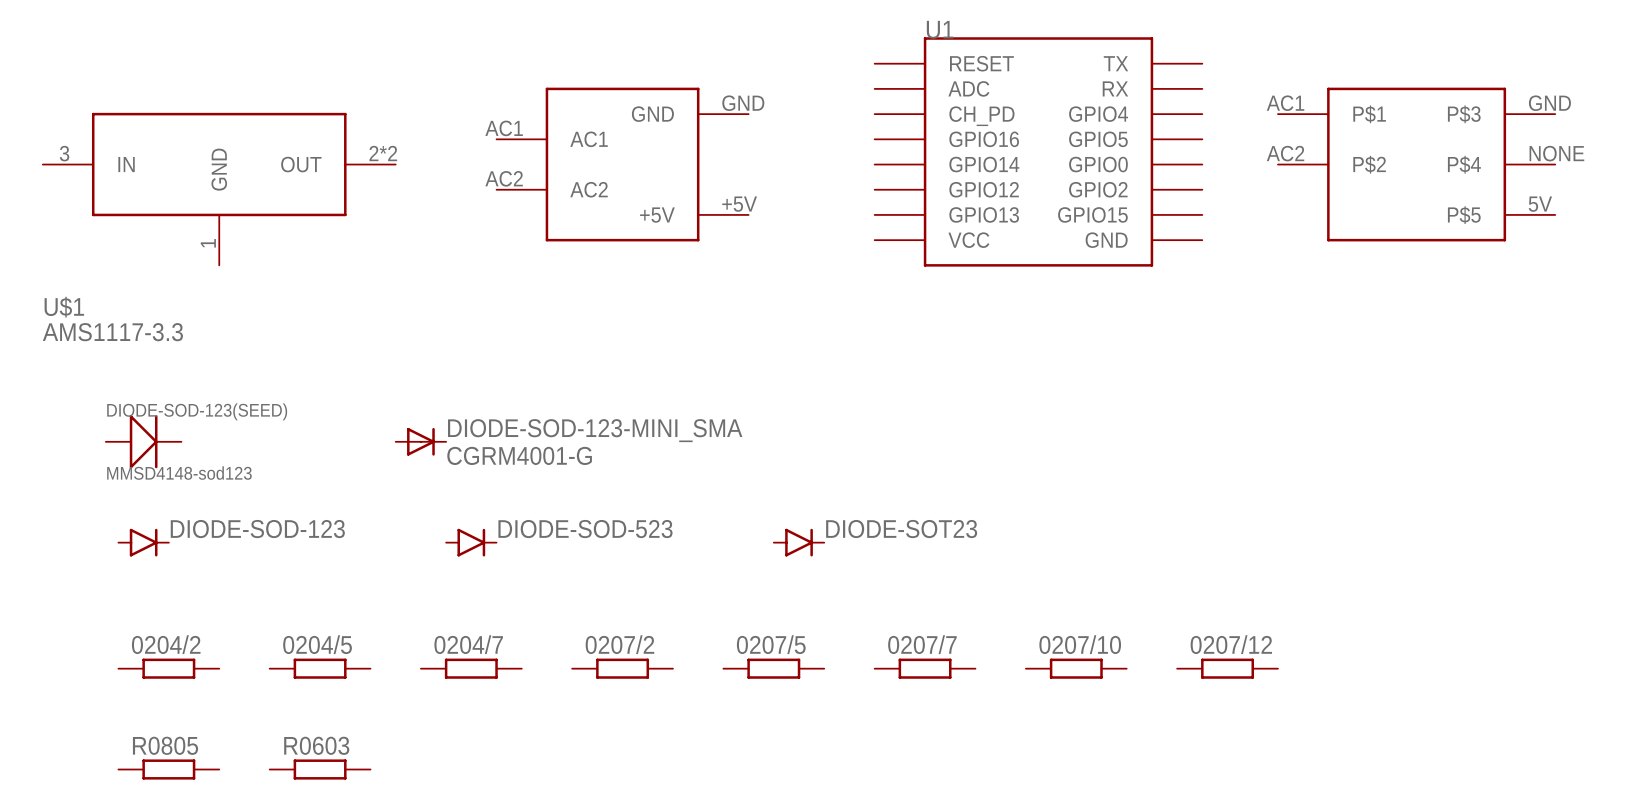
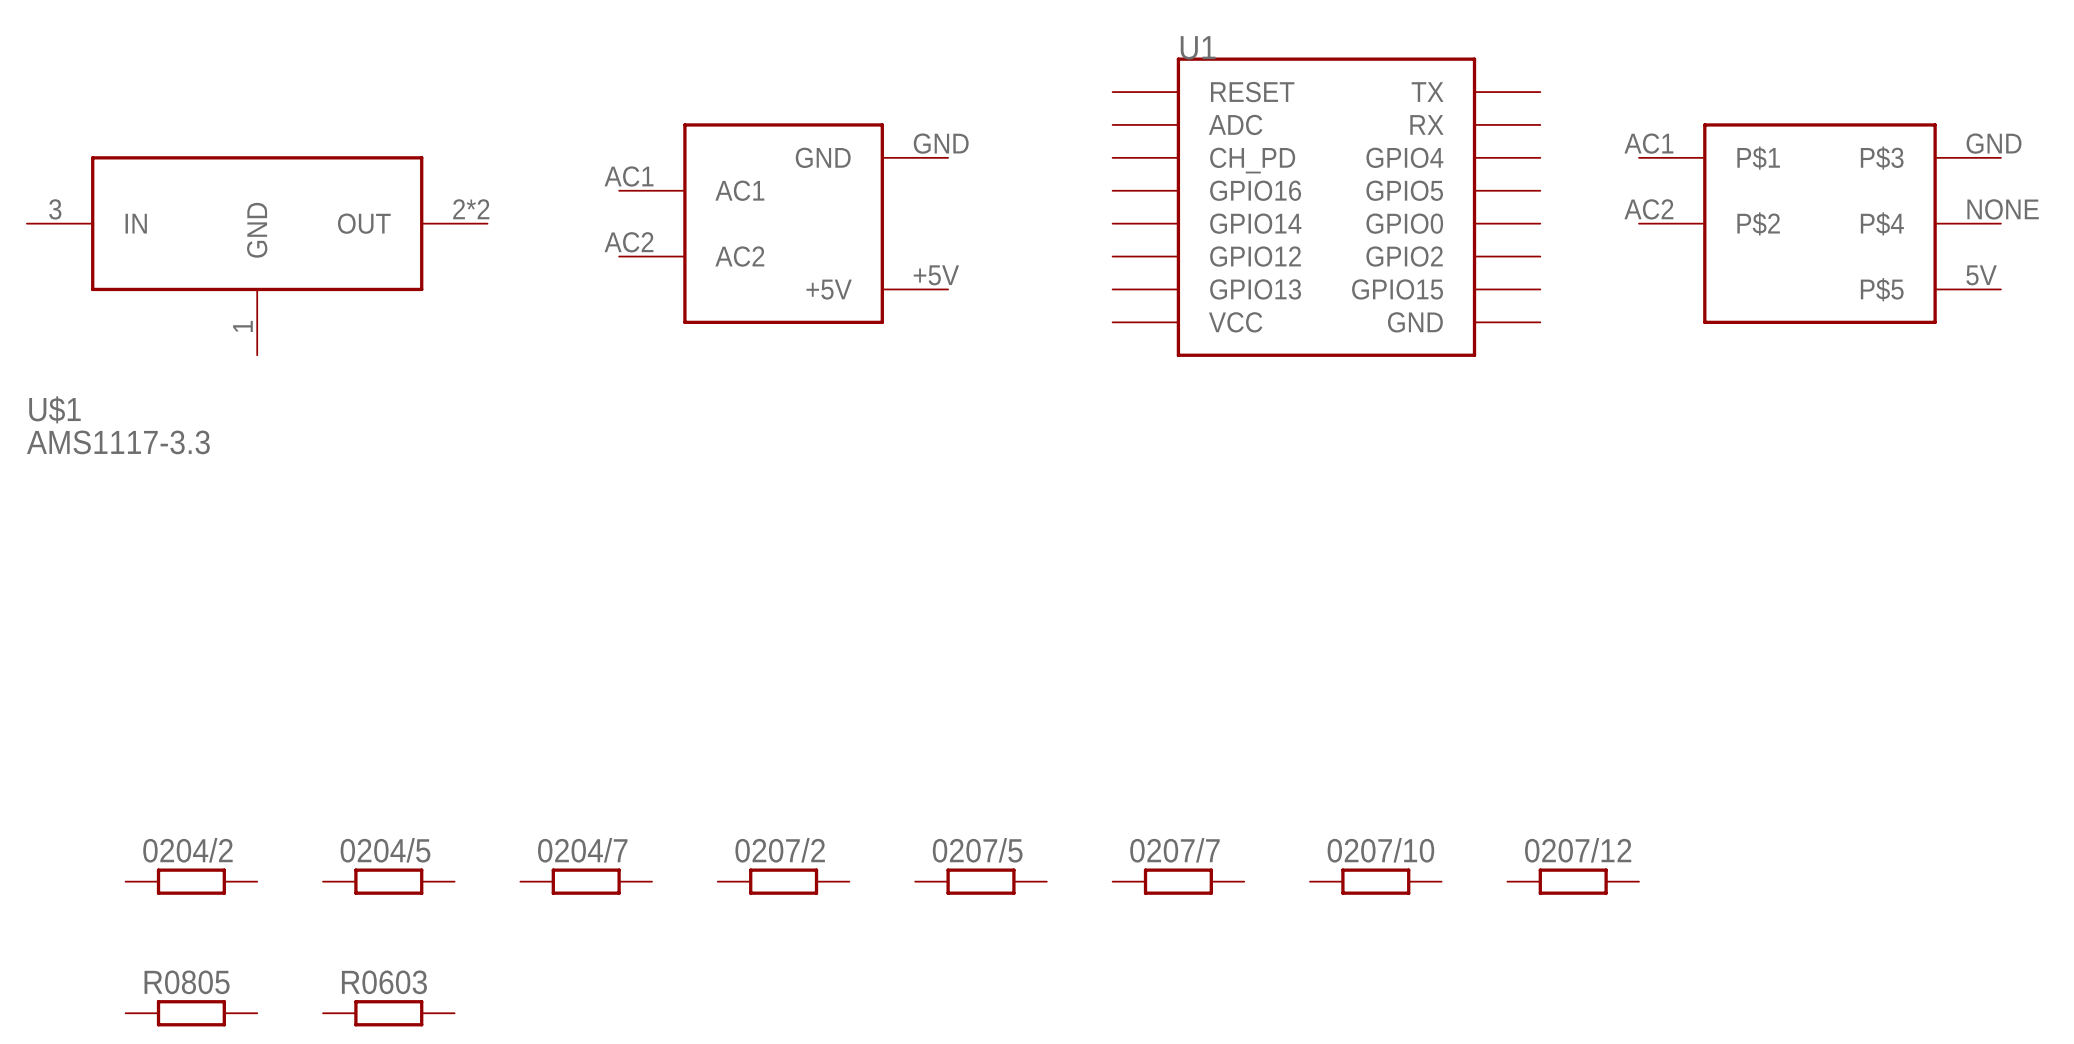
DIODE-SOD-123(SEED): MMSD4148-sod123 (143, 441) -> none
DIODE-SOD-123-MINI_SMA: CGRM4001-G (420, 441) -> none
DIODE-SOD-123: (143, 542) -> none
DIODE-SOD-523: (471, 542) -> none
DIODE-SOT23: (799, 542) -> none

